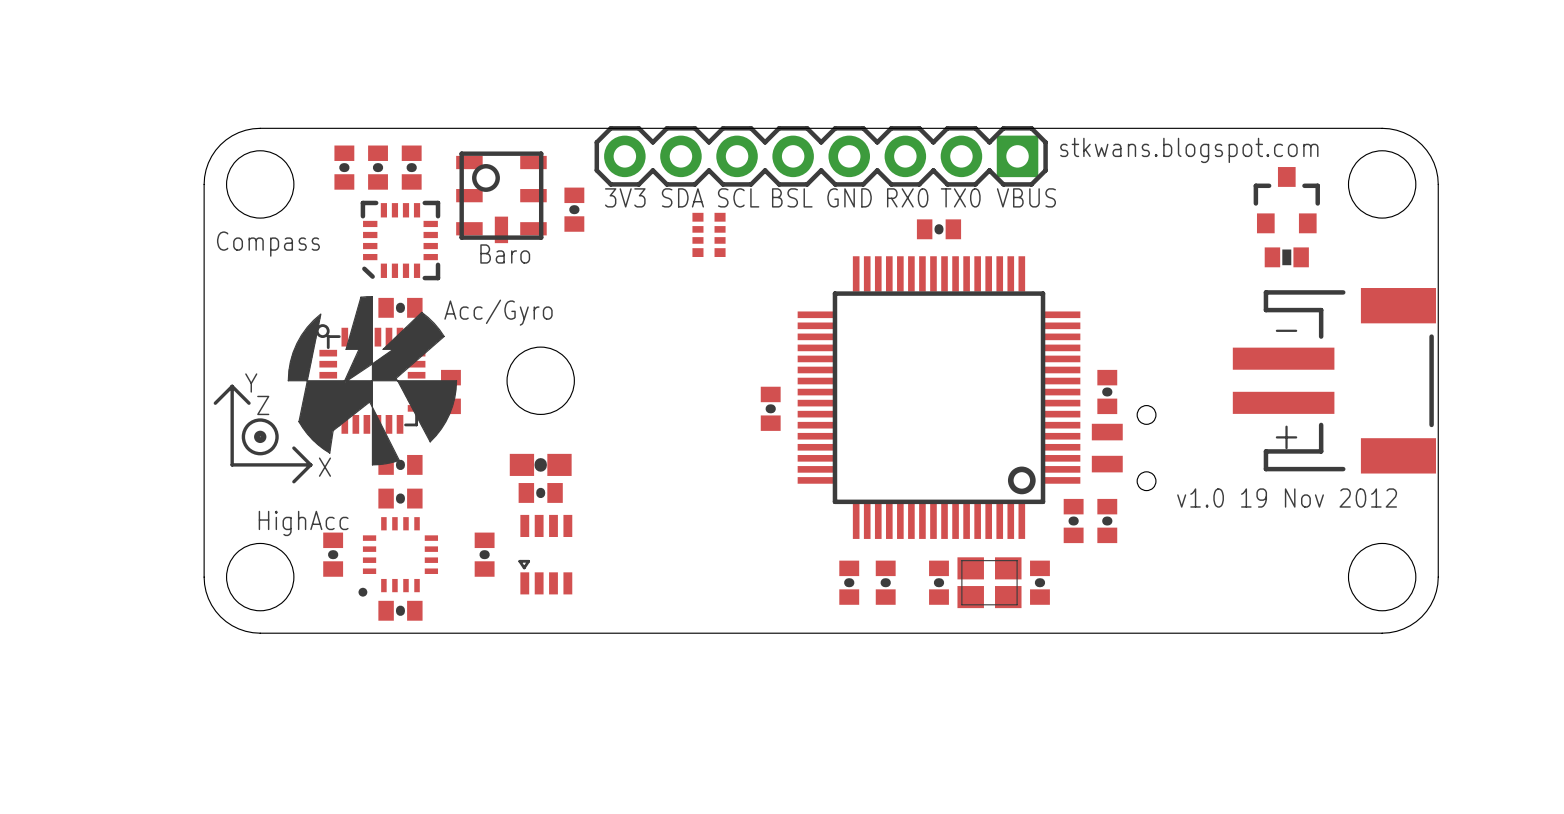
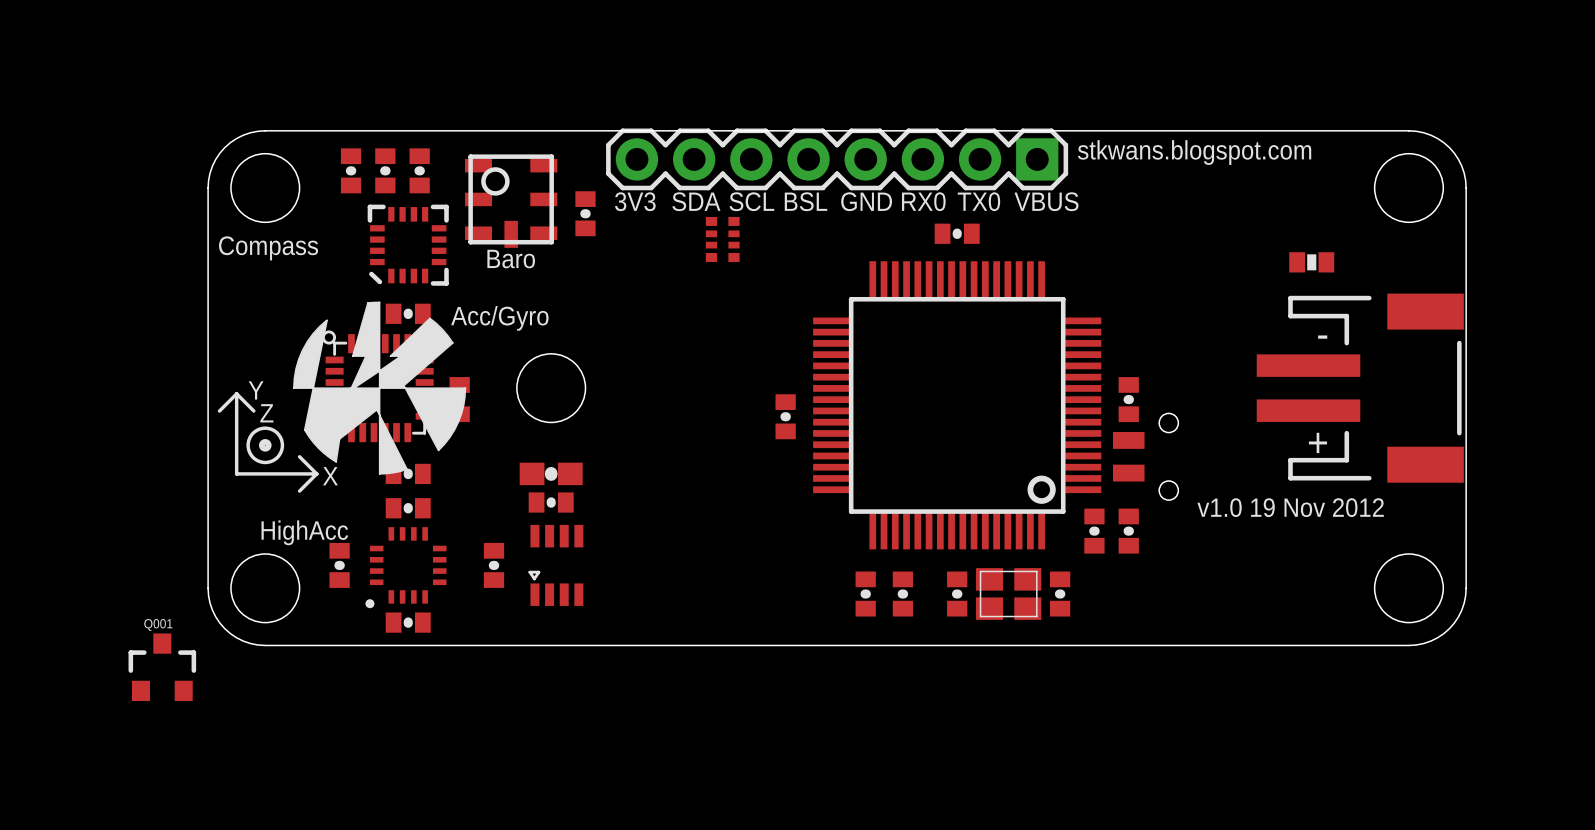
part: (1286, 200) -> none
Q001: none -> (162, 667)

